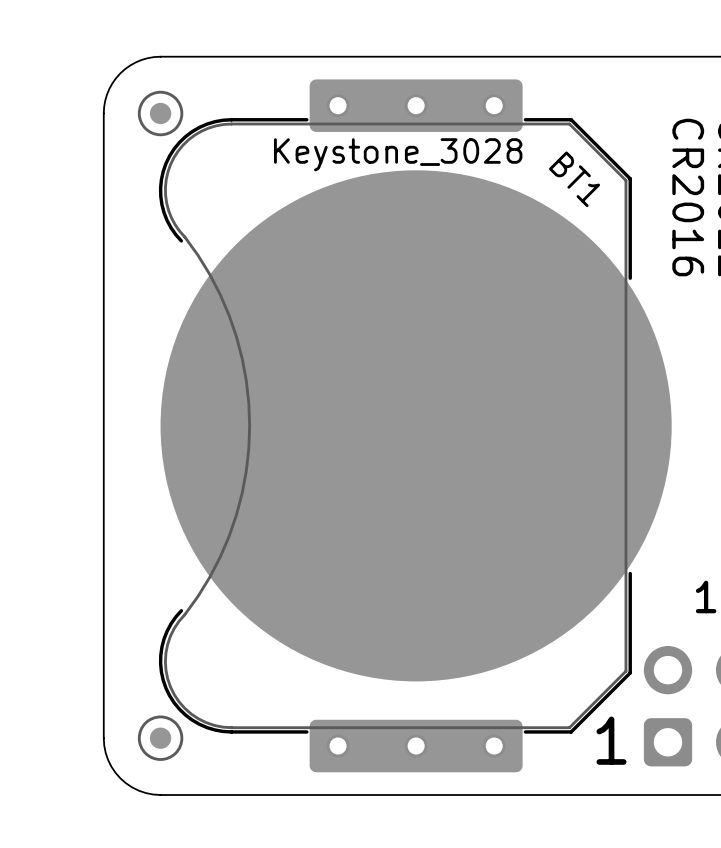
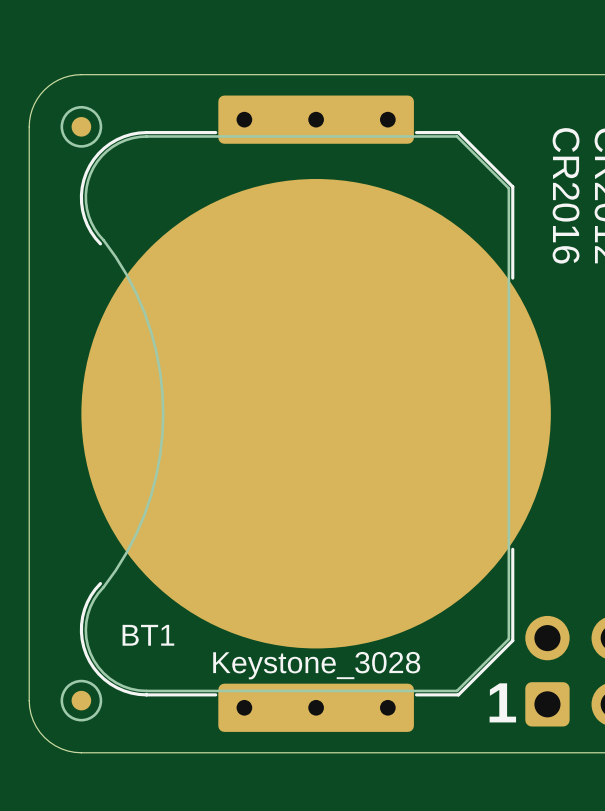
BT1 value position: Keystone_3028 (398, 154) -> Keystone_3028 (316, 665)
BT1 name rotation: 0° (574, 179) -> 45° counterclockwise (148, 635)
BT1 name position: BT1 (574, 179) -> BT1 (148, 635)

